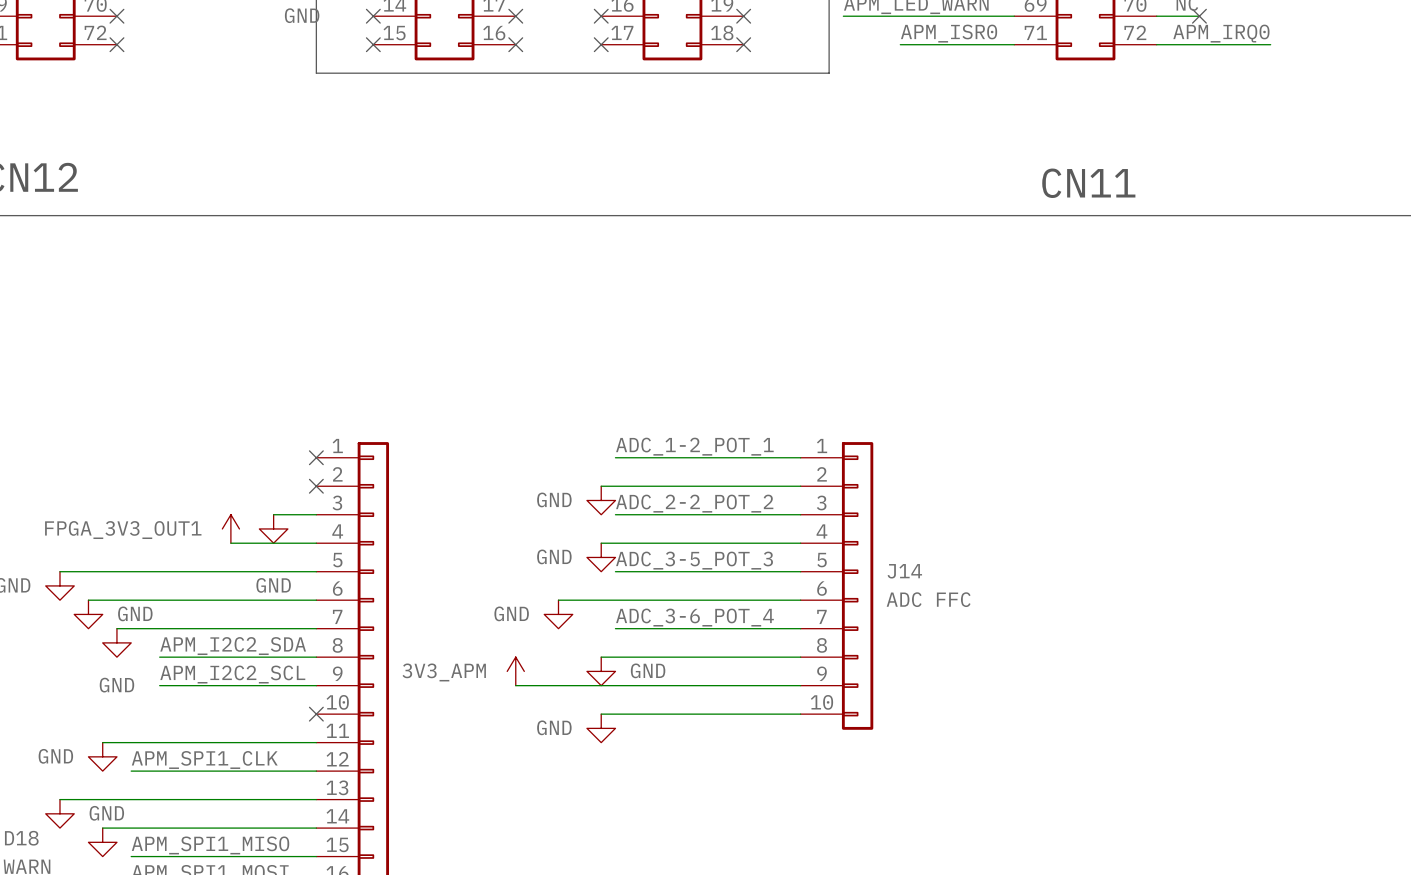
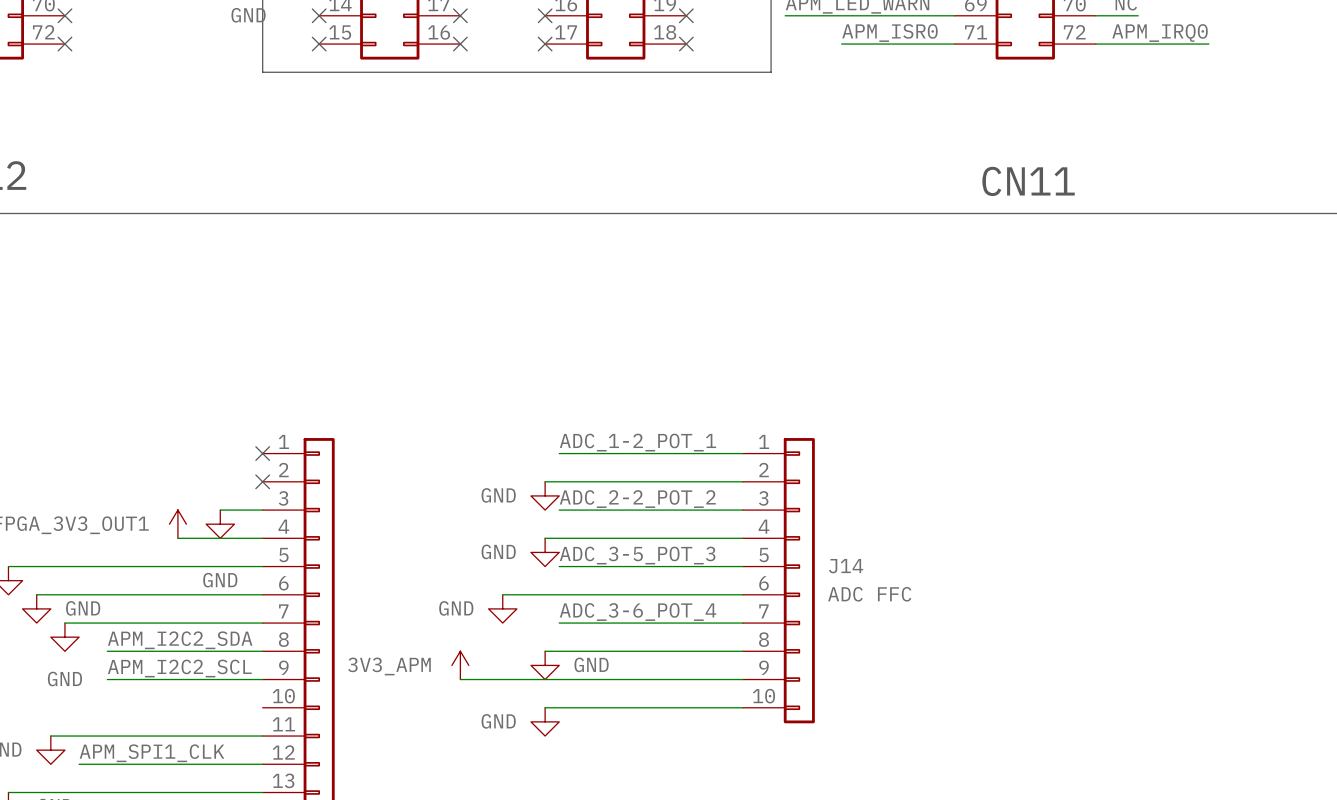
no-connect mark: (1199, 16) -> none
no-connect mark: (316, 714) -> none

